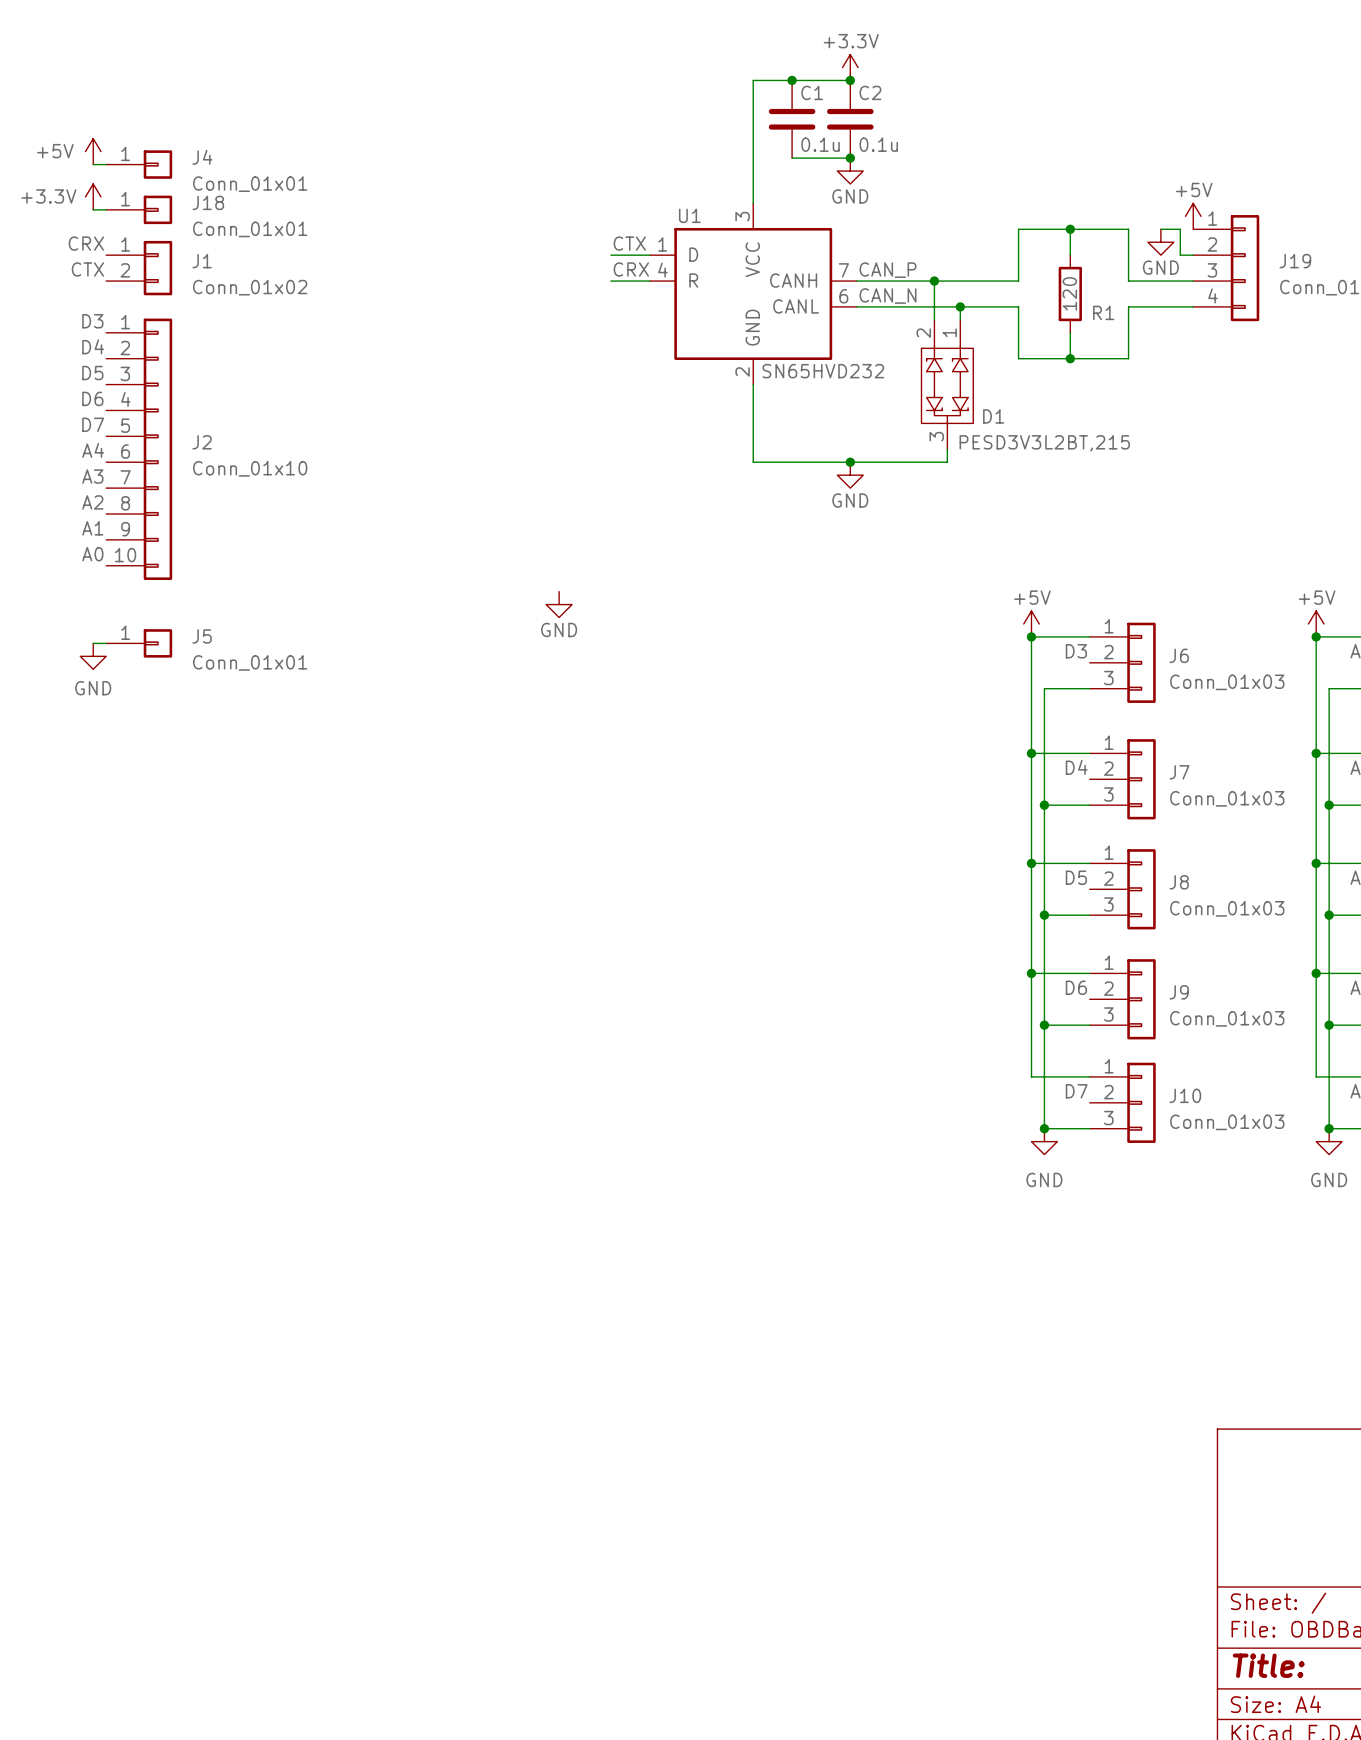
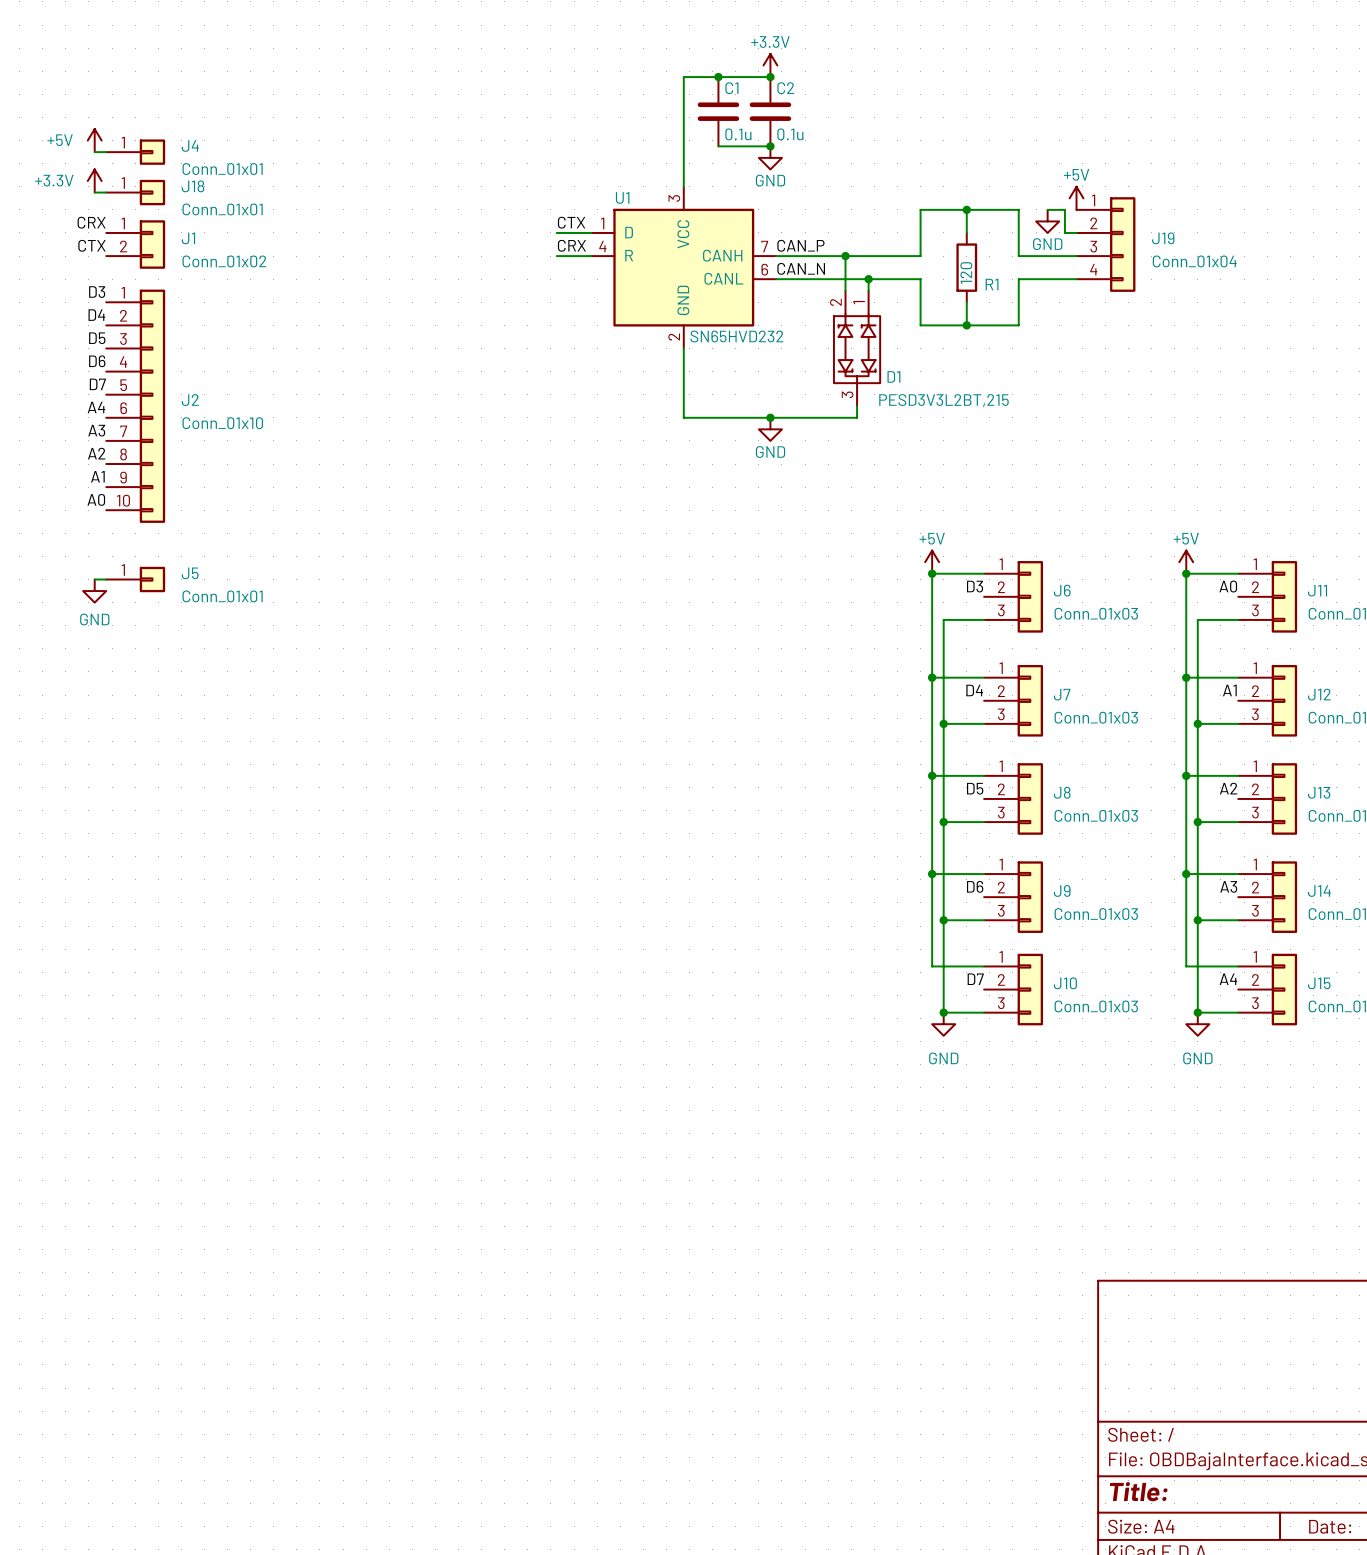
power symbol: GND (559, 604) -> none

